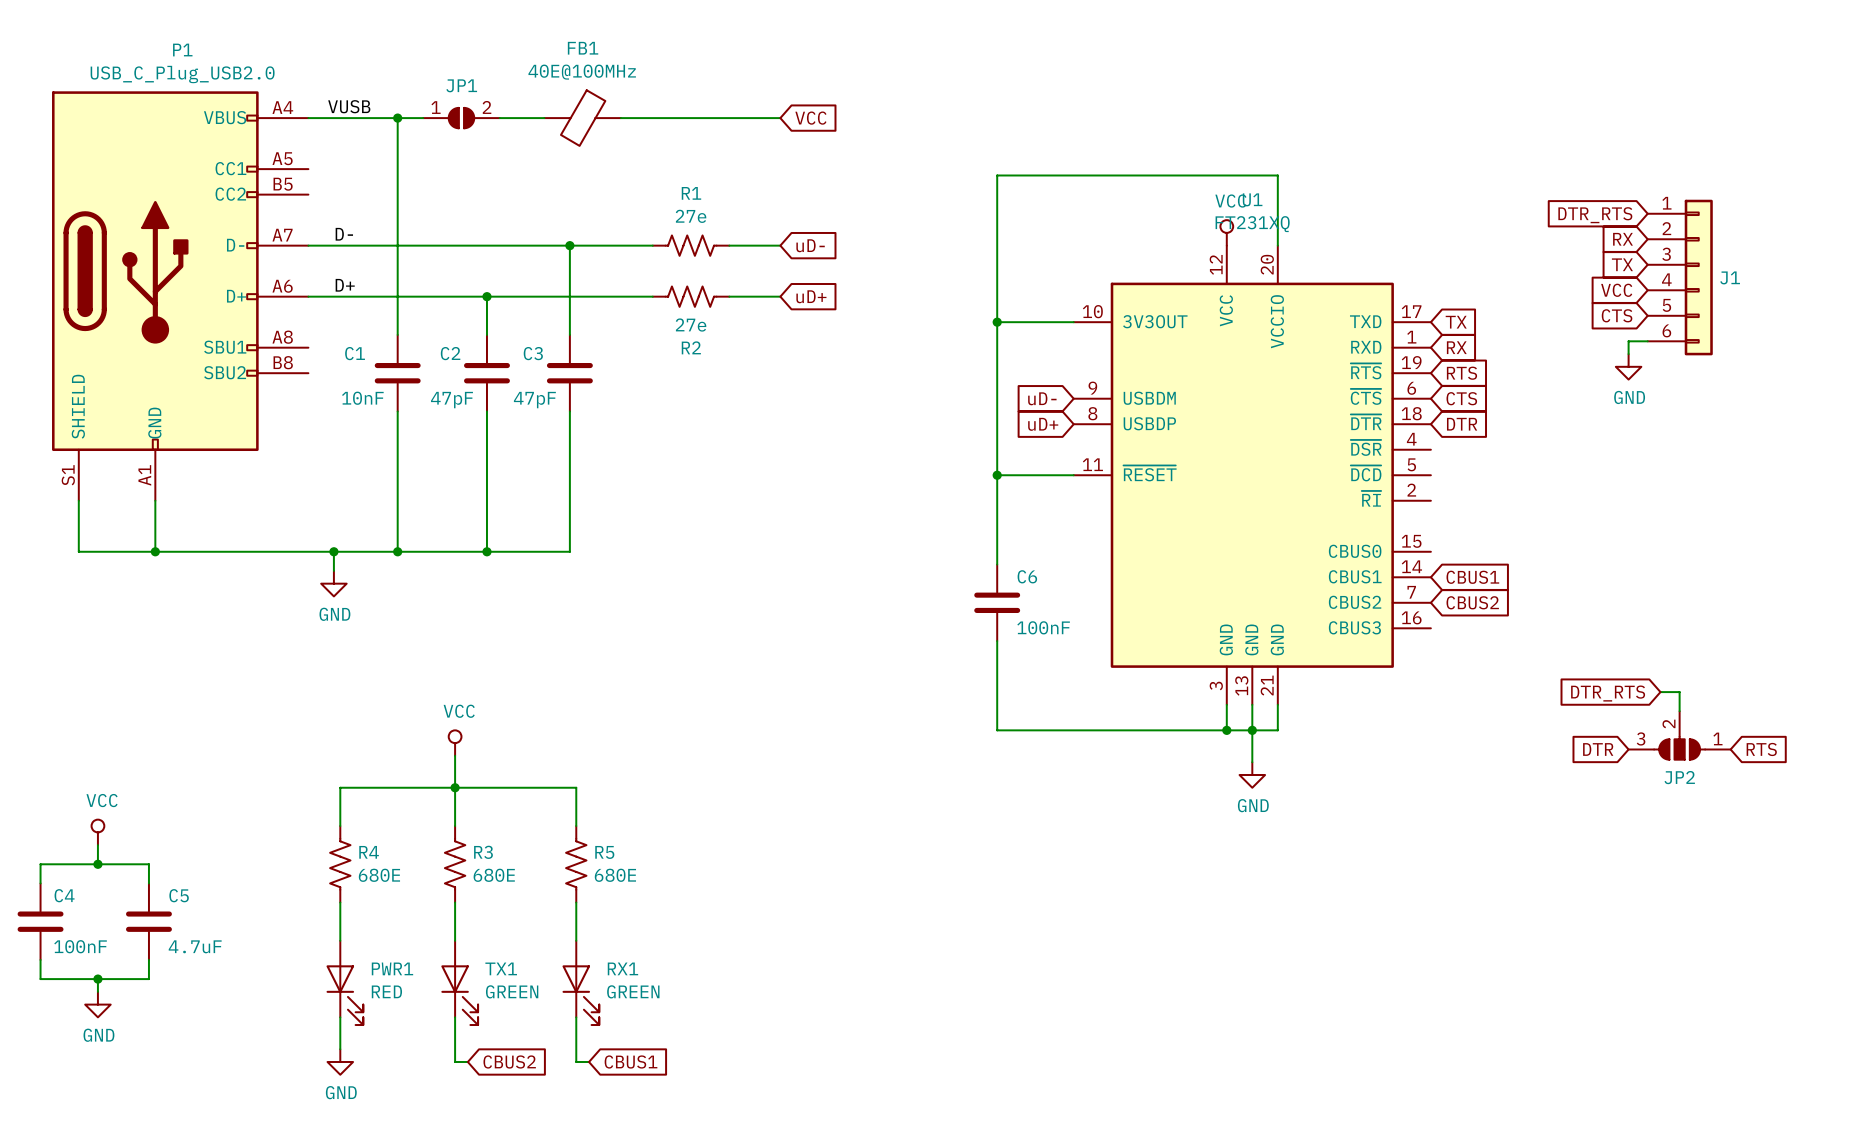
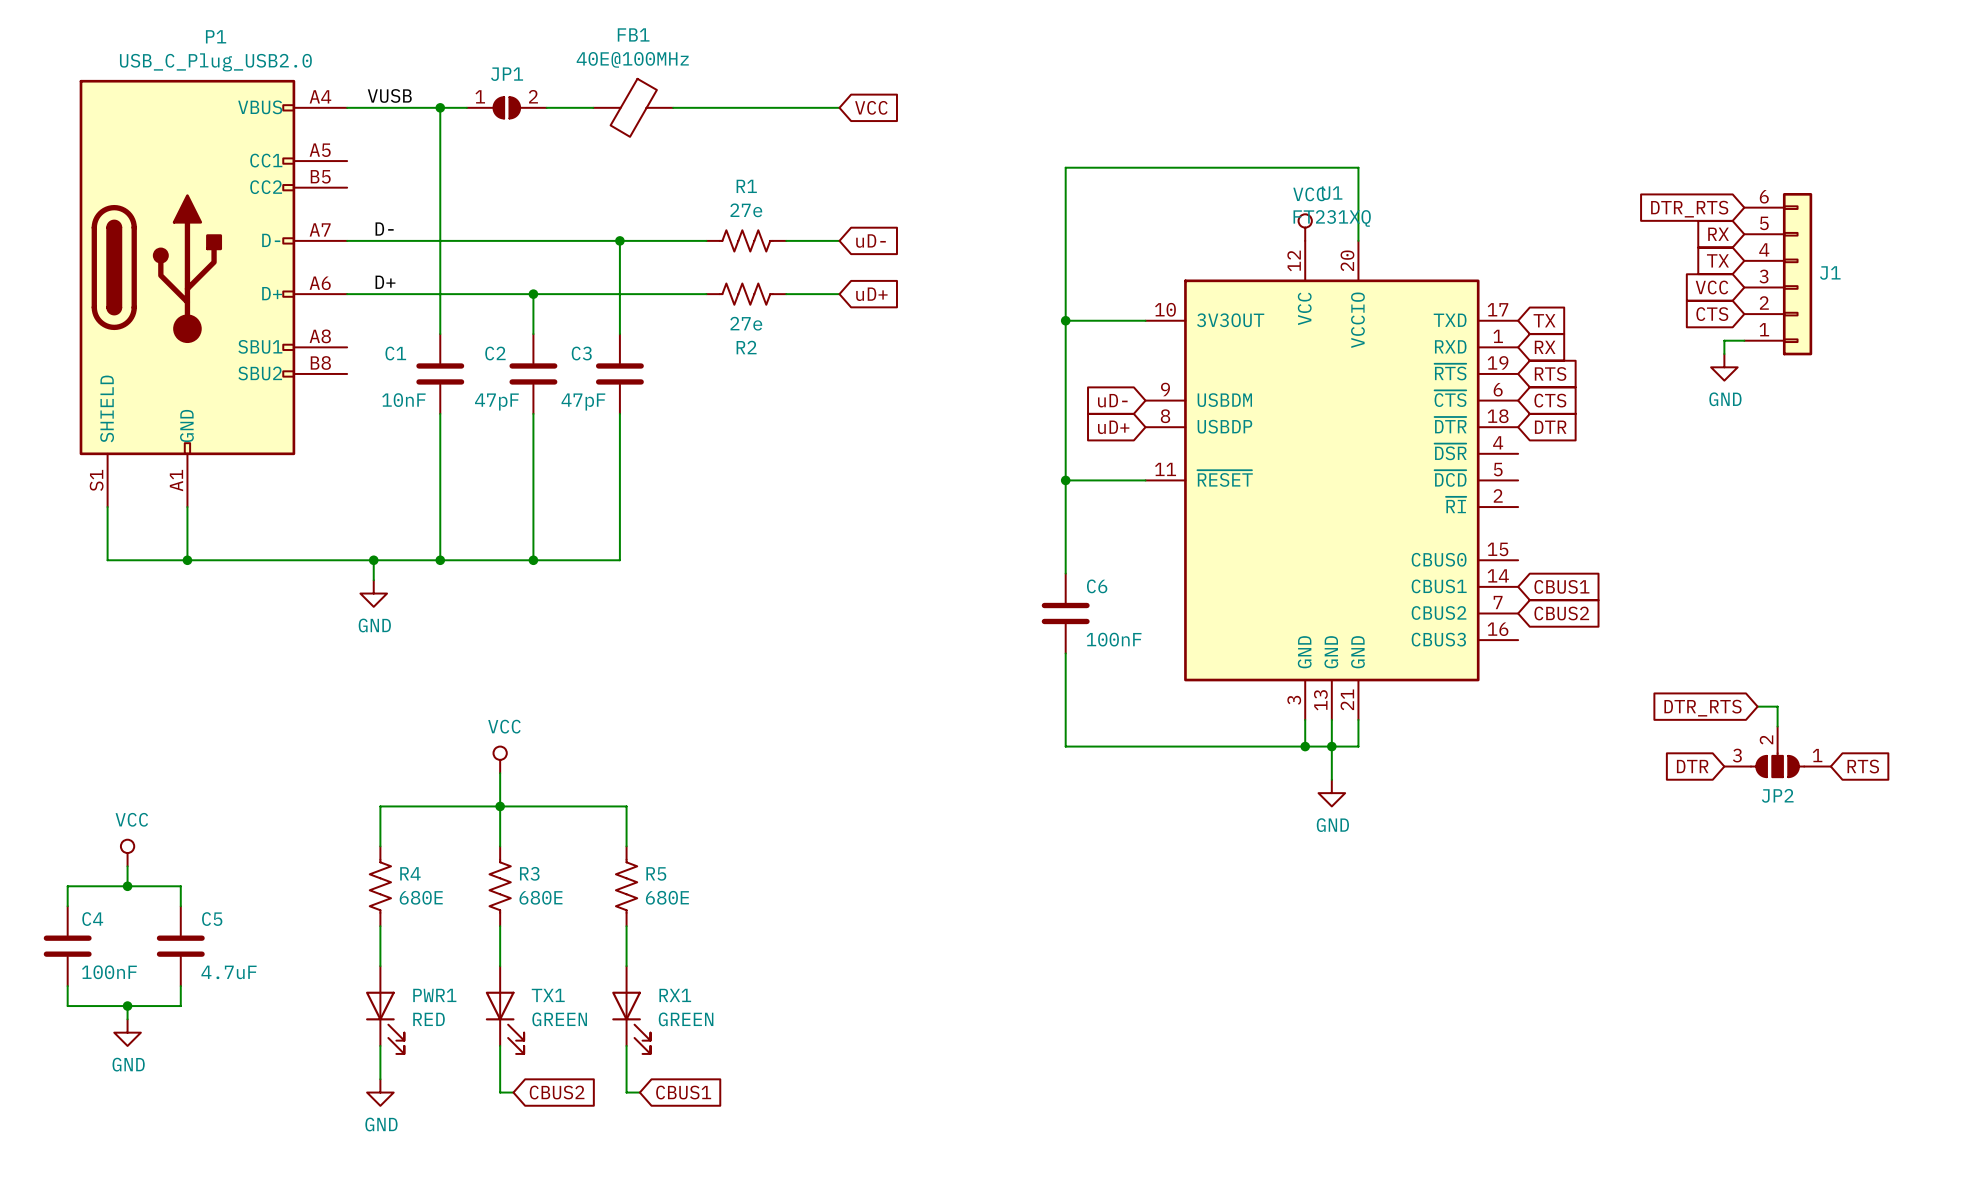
J1 flip: as is (1698, 277) -> up-down (1797, 274)

